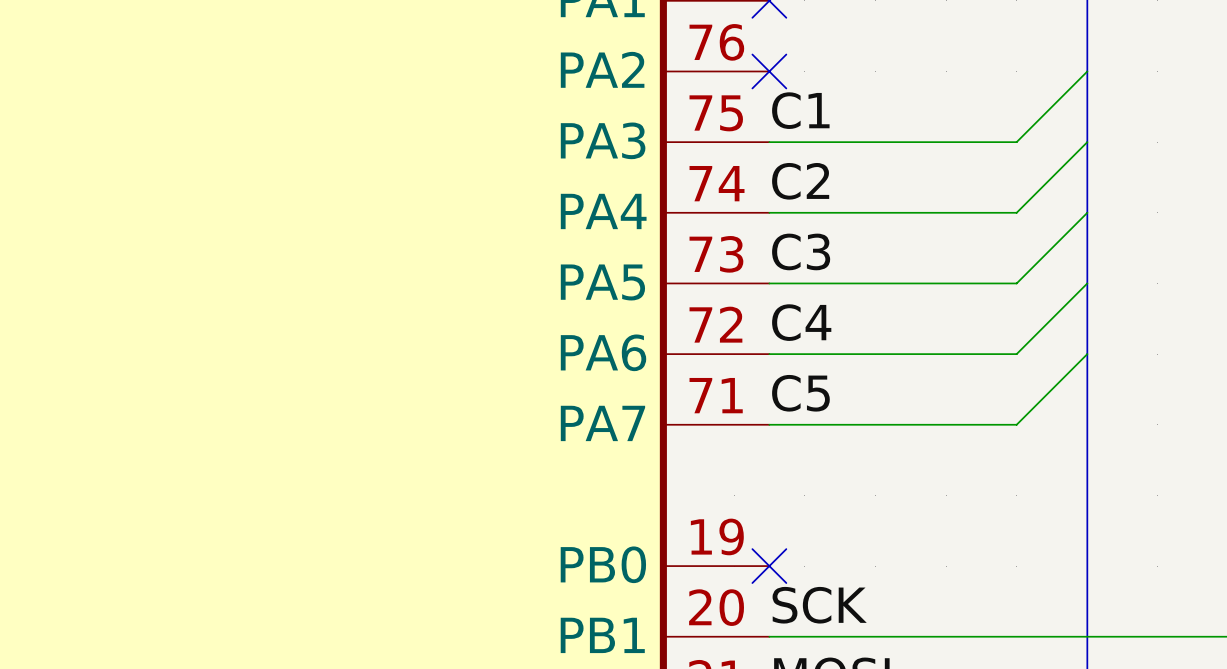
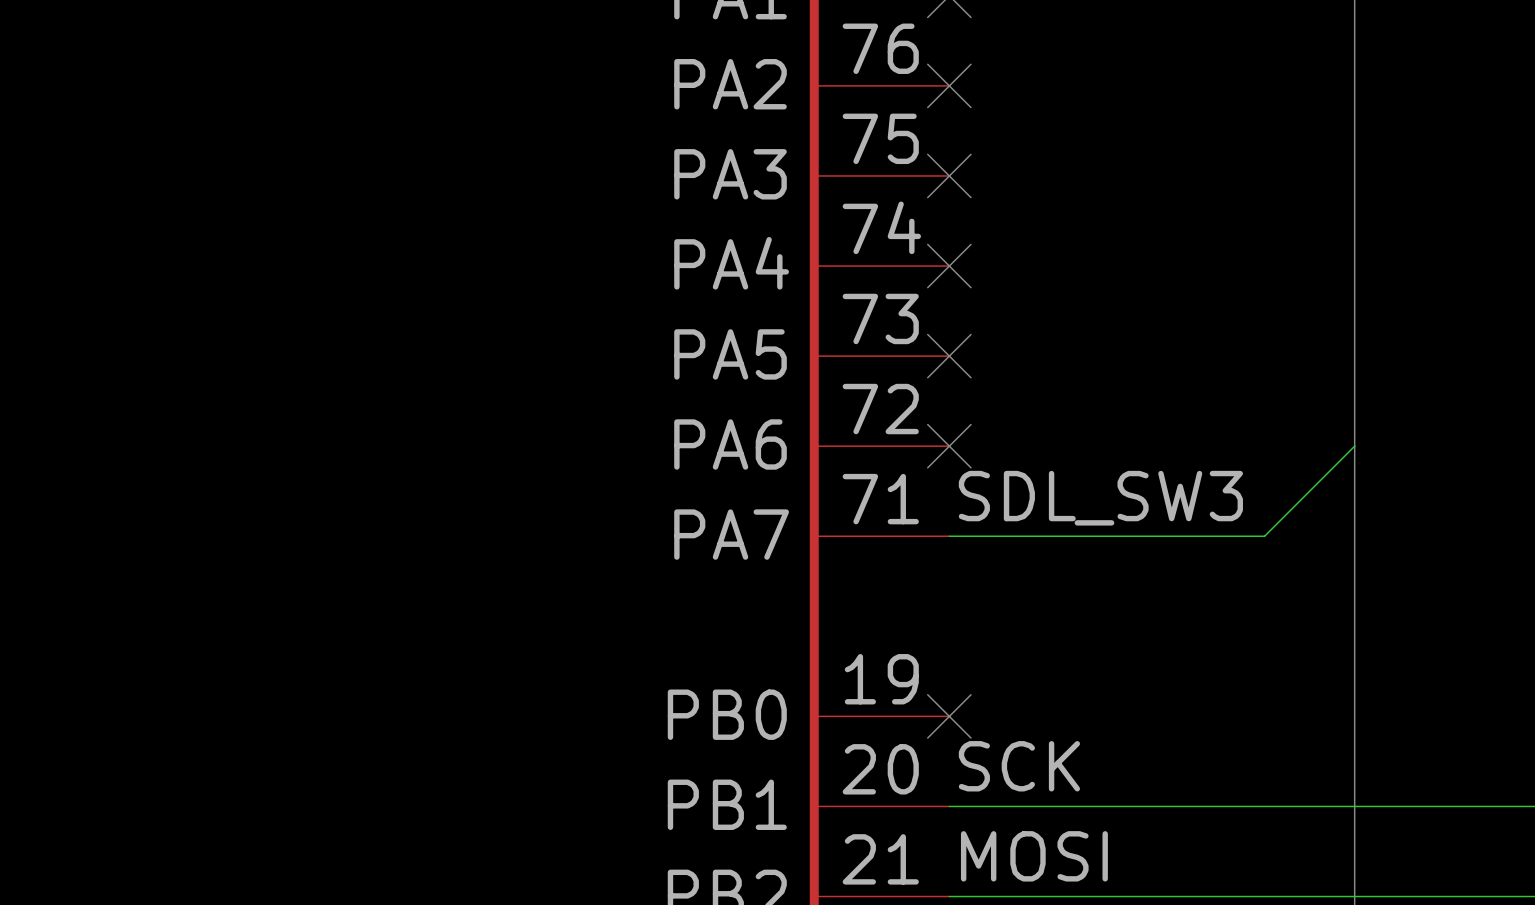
wire: (1087, 71) (1016, 142) (769, 142) -> none
label: C1 (800, 110) -> none
no-connect mark: none -> (949, 175)
wire: (1087, 142) (1016, 212) (769, 212) -> none
label: C2 (800, 181) -> none
no-connect mark: none -> (949, 266)
wire: (1087, 212) (1016, 283) (769, 283) -> none
label: C3 (801, 251) -> none
no-connect mark: none -> (949, 356)
wire: (1087, 283) (1016, 354) (769, 354) -> none
label: C4 (801, 322) -> none
no-connect mark: none -> (949, 446)
label: C5 (800, 393) -> SDL_SW3 (1100, 498)

